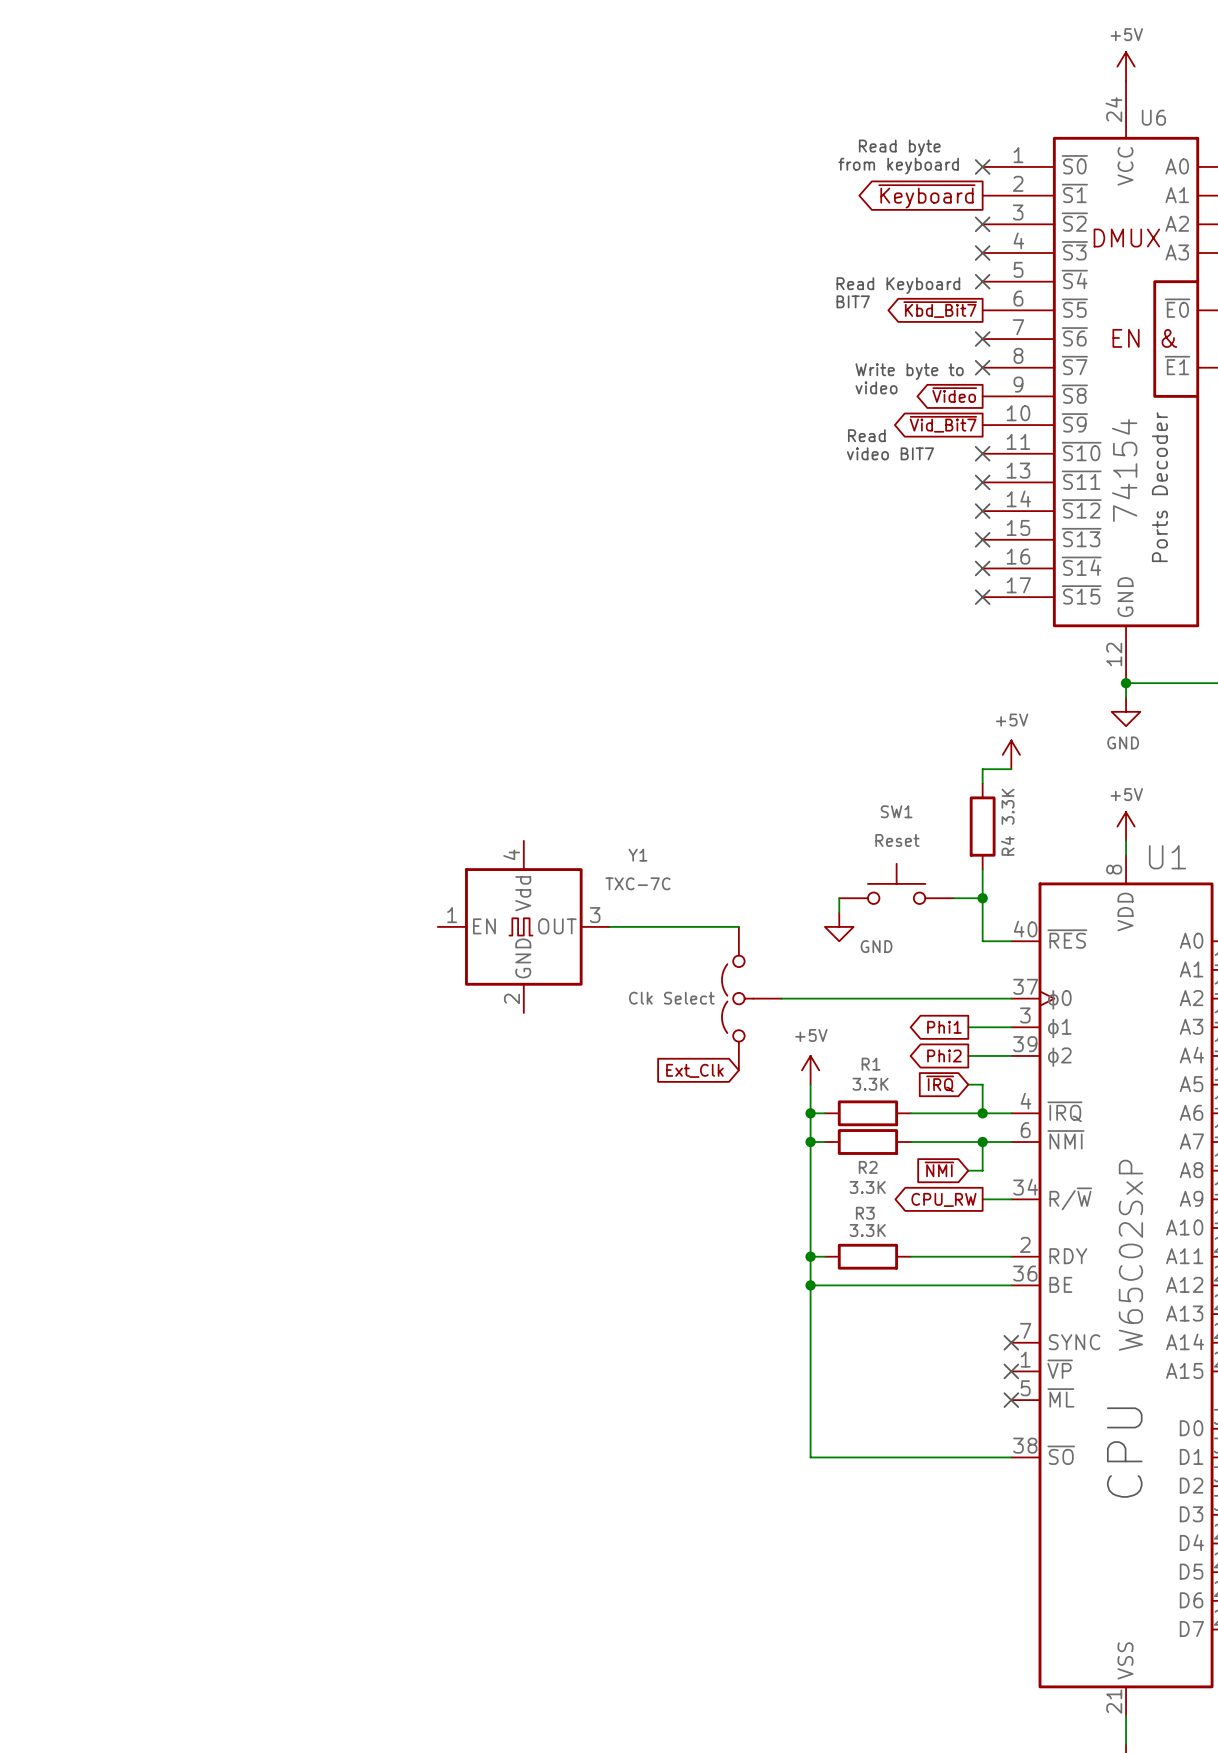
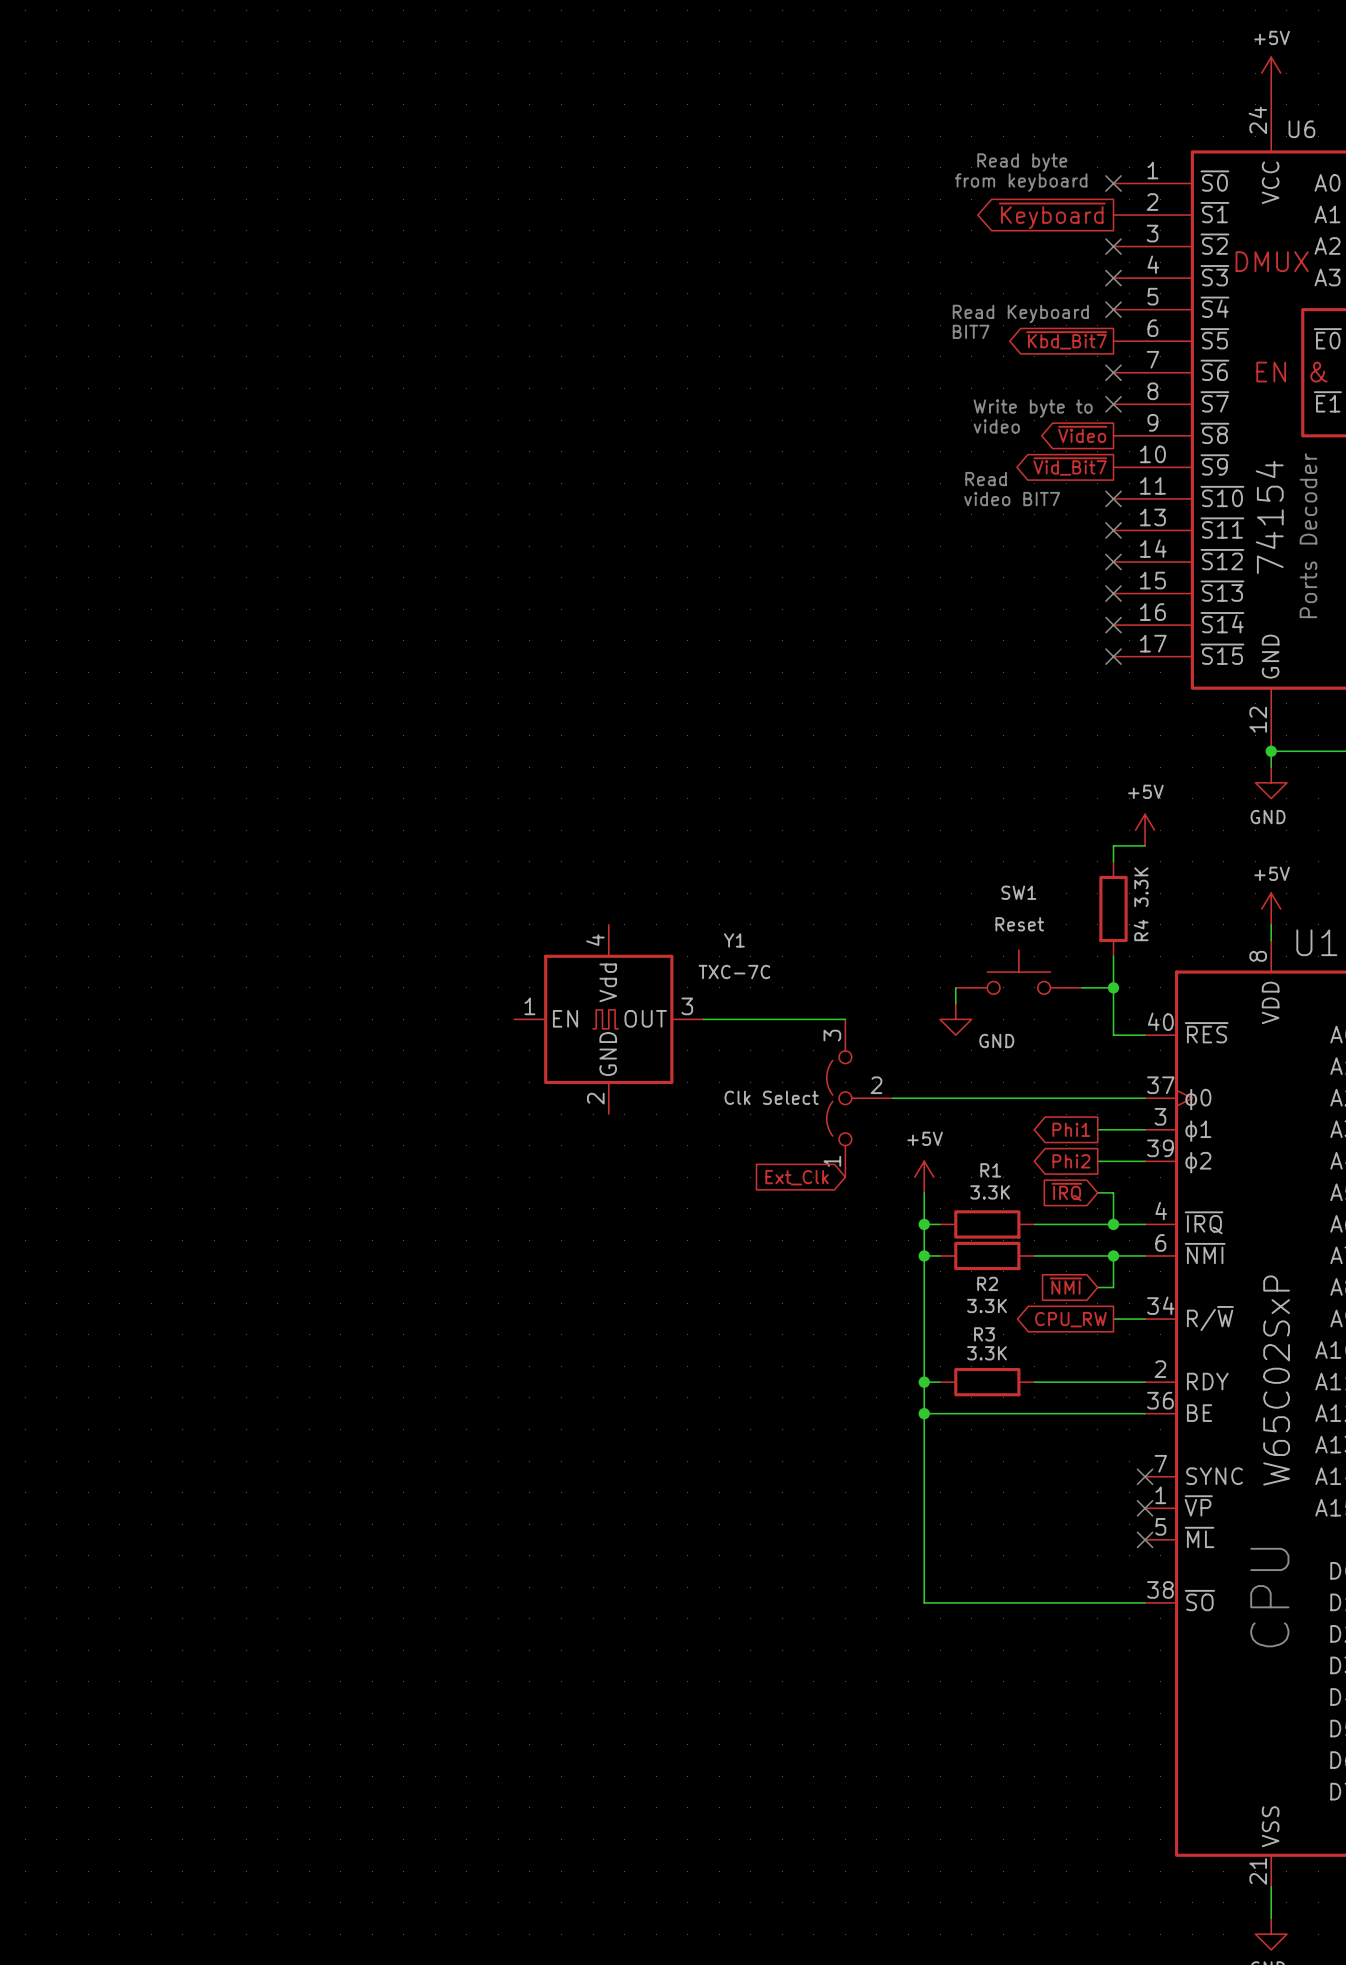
part pin number: none -> 3 (832, 1035)
part pin number: none -> 2 (876, 1085)
part pin number: none -> 1 (832, 1161)

